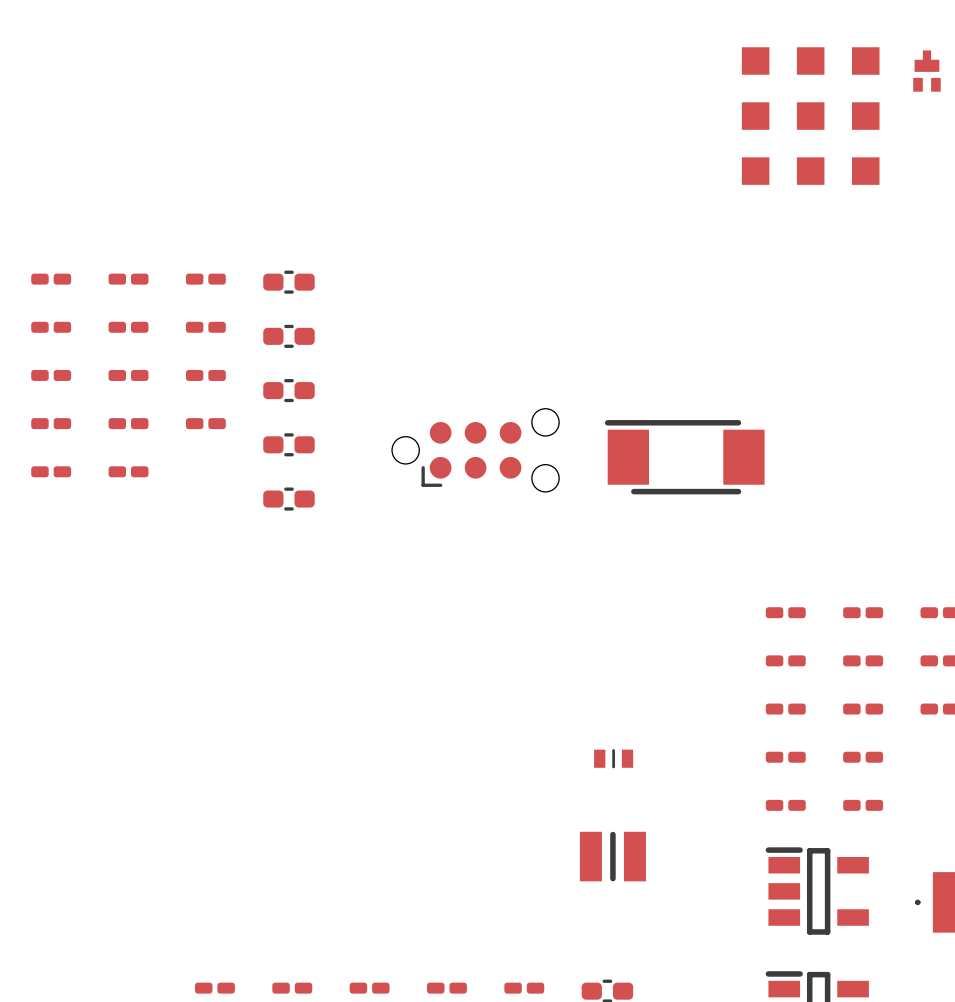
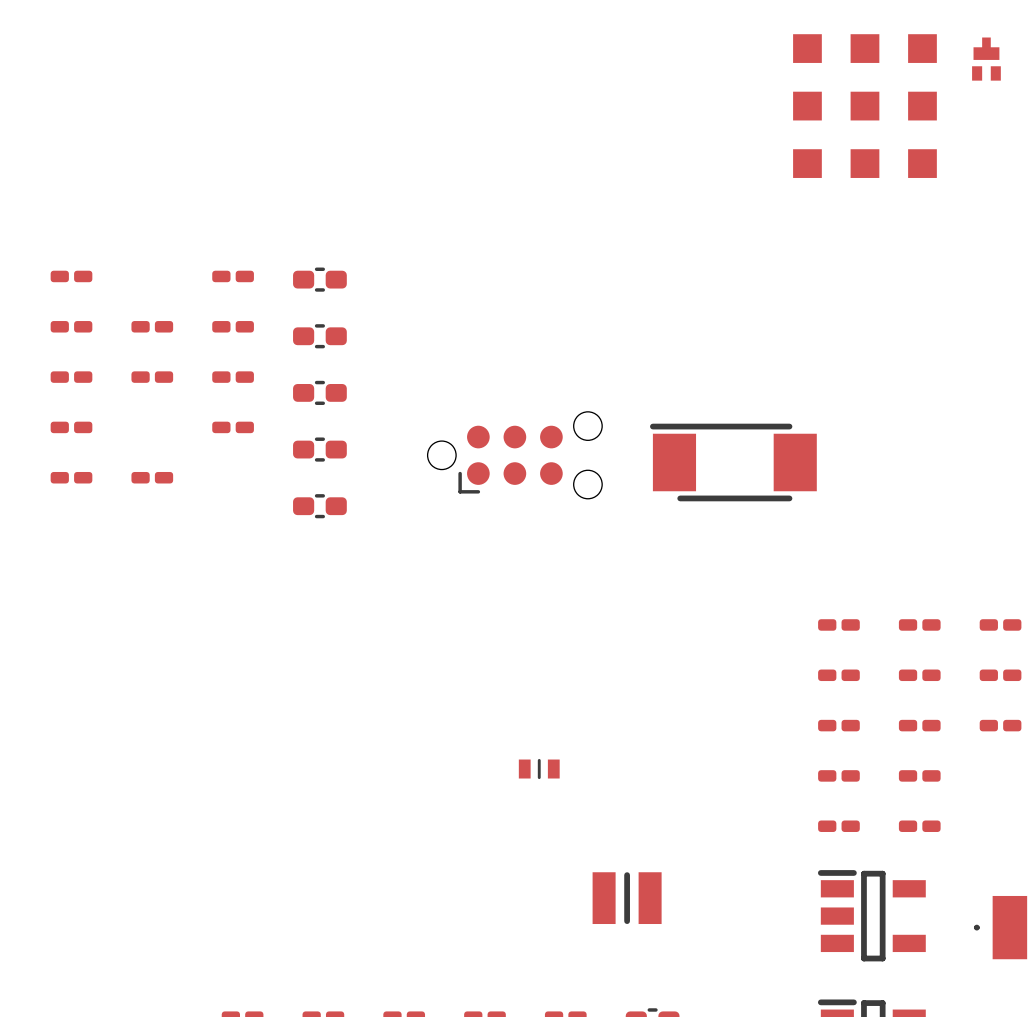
part: (128, 279) -> none
part: (128, 423) -> none
part position: (613, 758) -> (539, 769)
part position: (612, 856) -> (627, 898)

